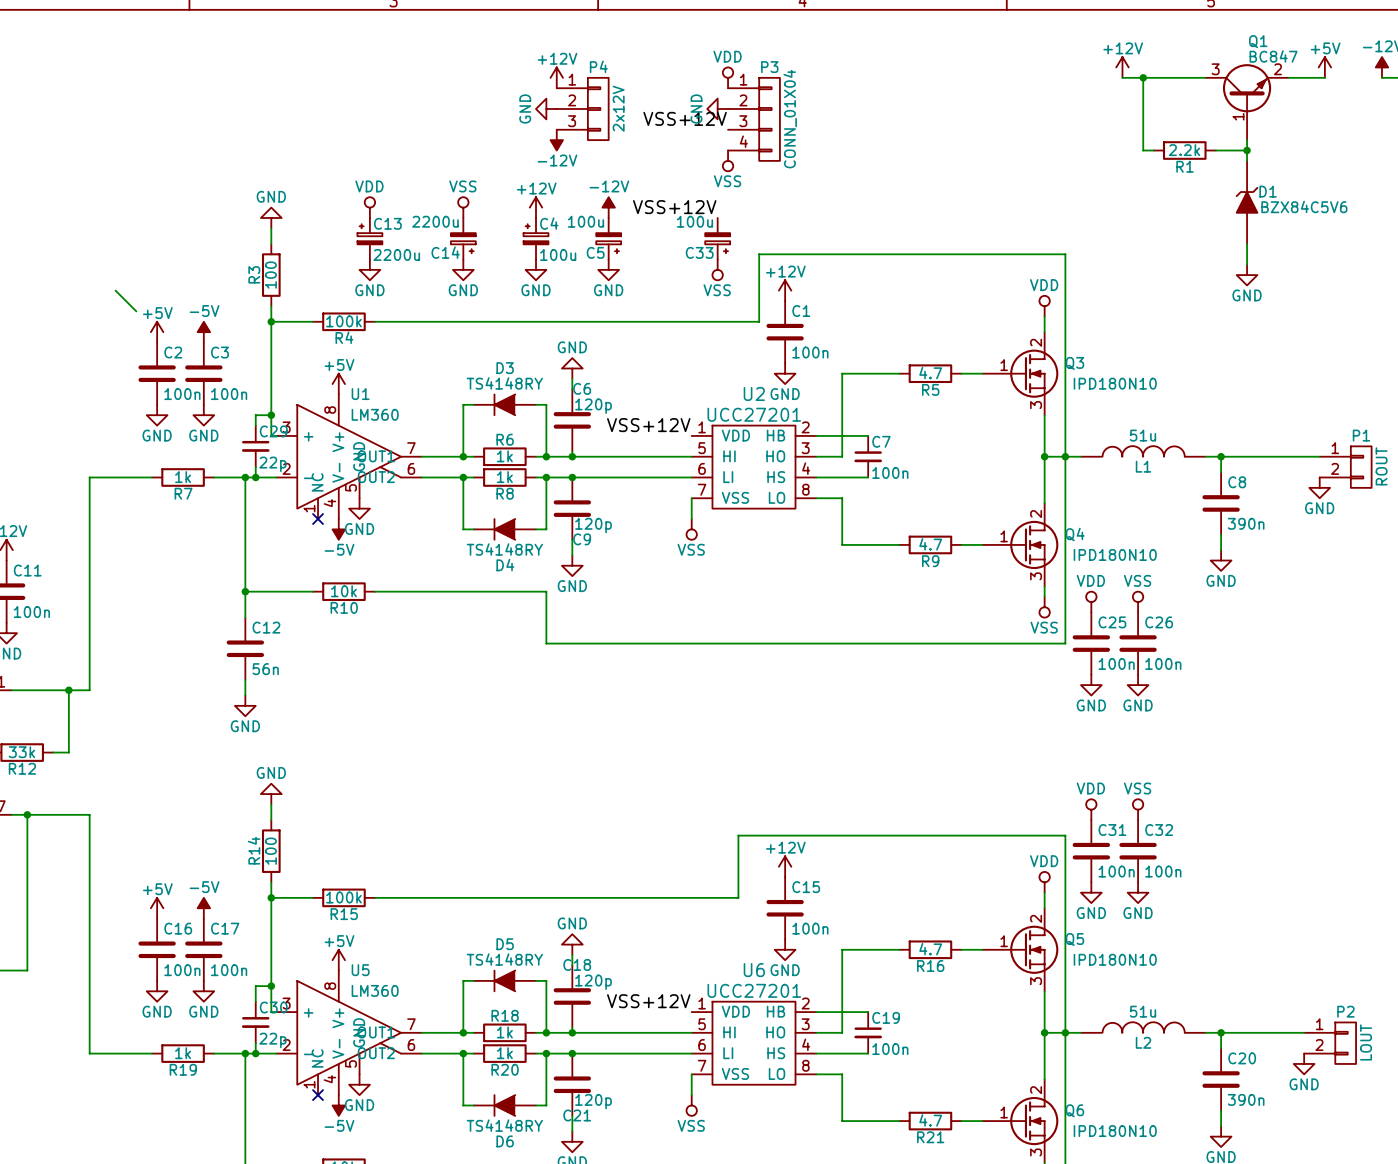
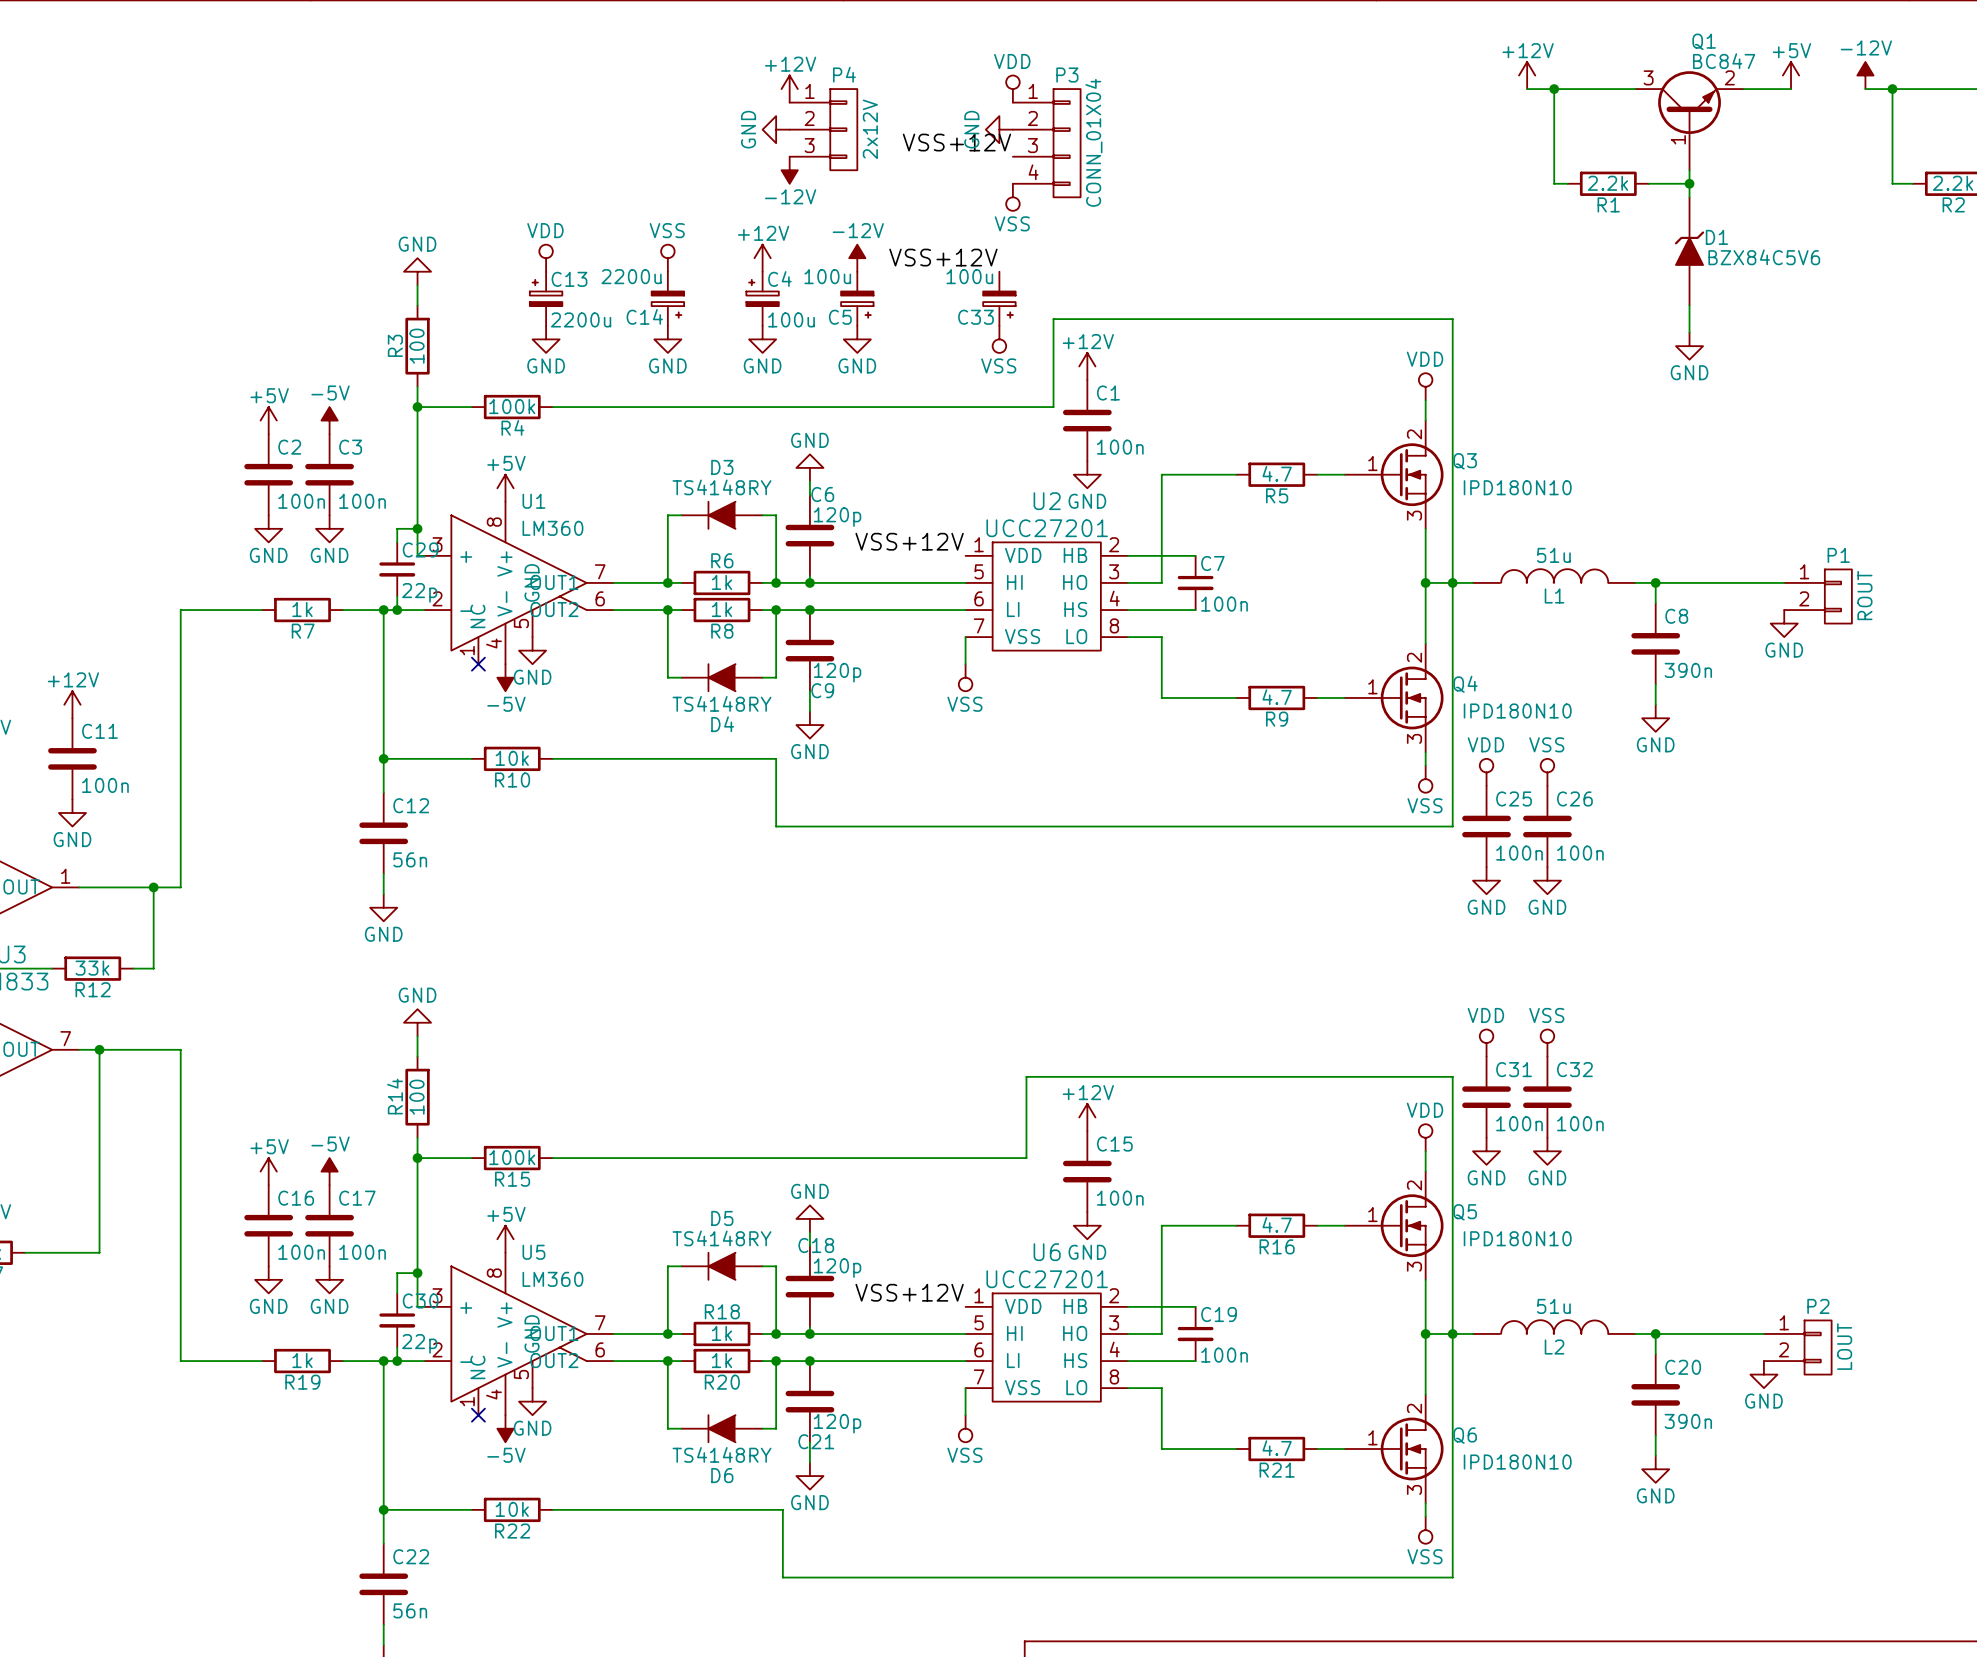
wire: (115, 290) (136, 311) -> none

